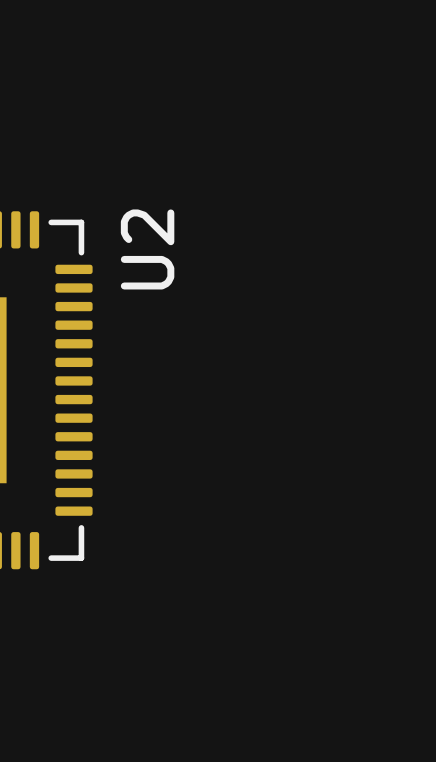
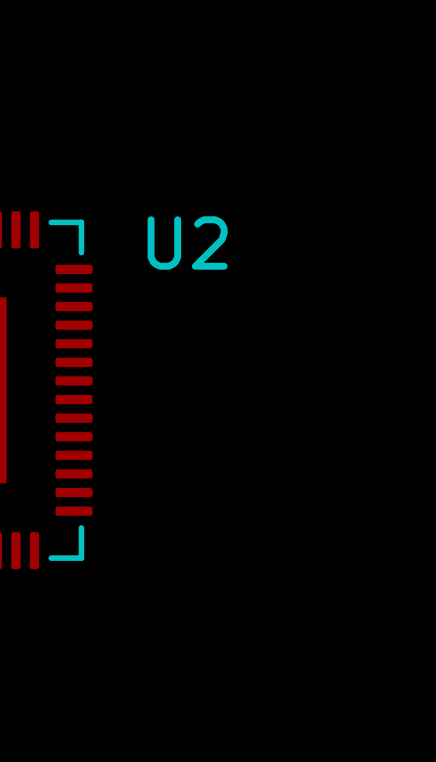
U2 name rotation: 0° (147, 249) -> 90° clockwise (187, 243)

